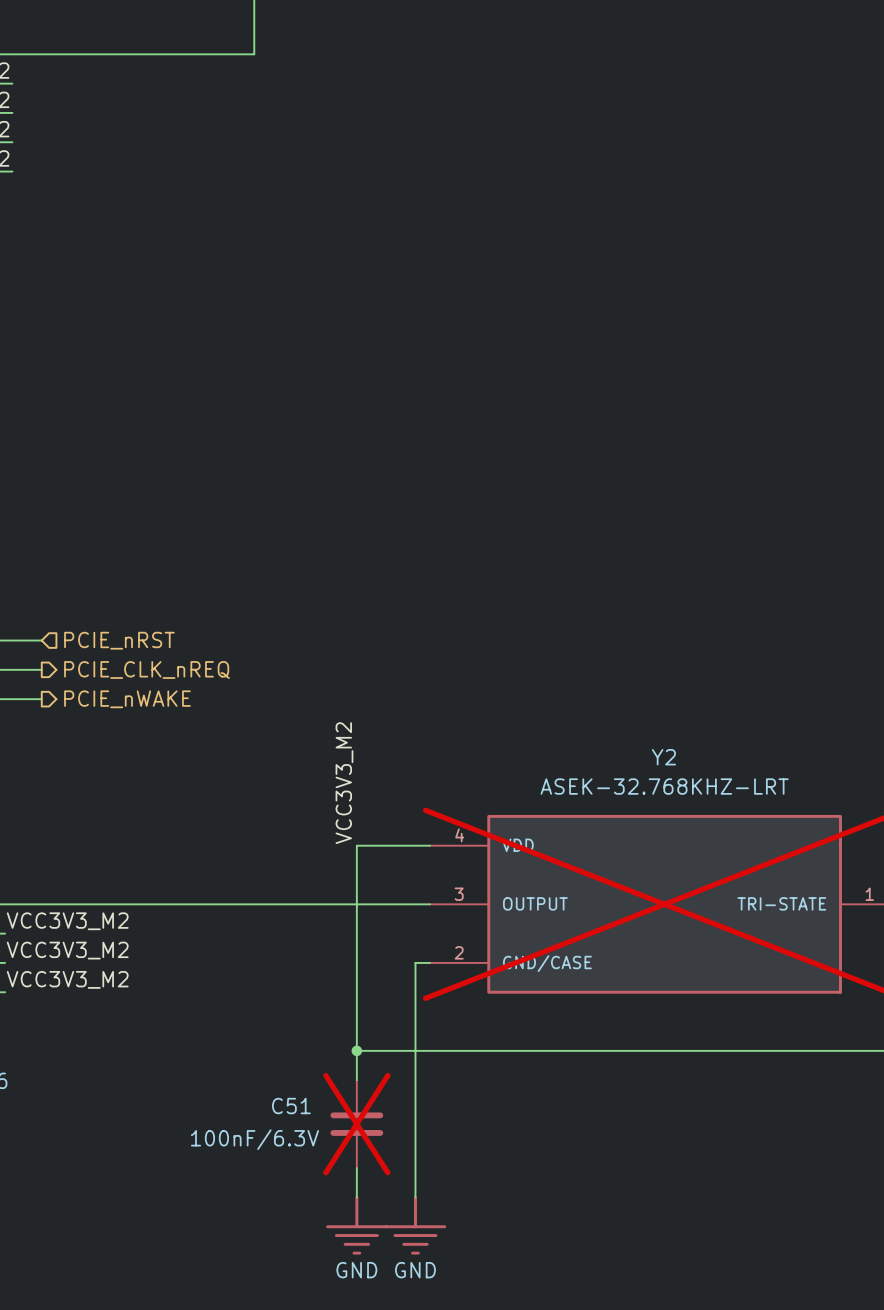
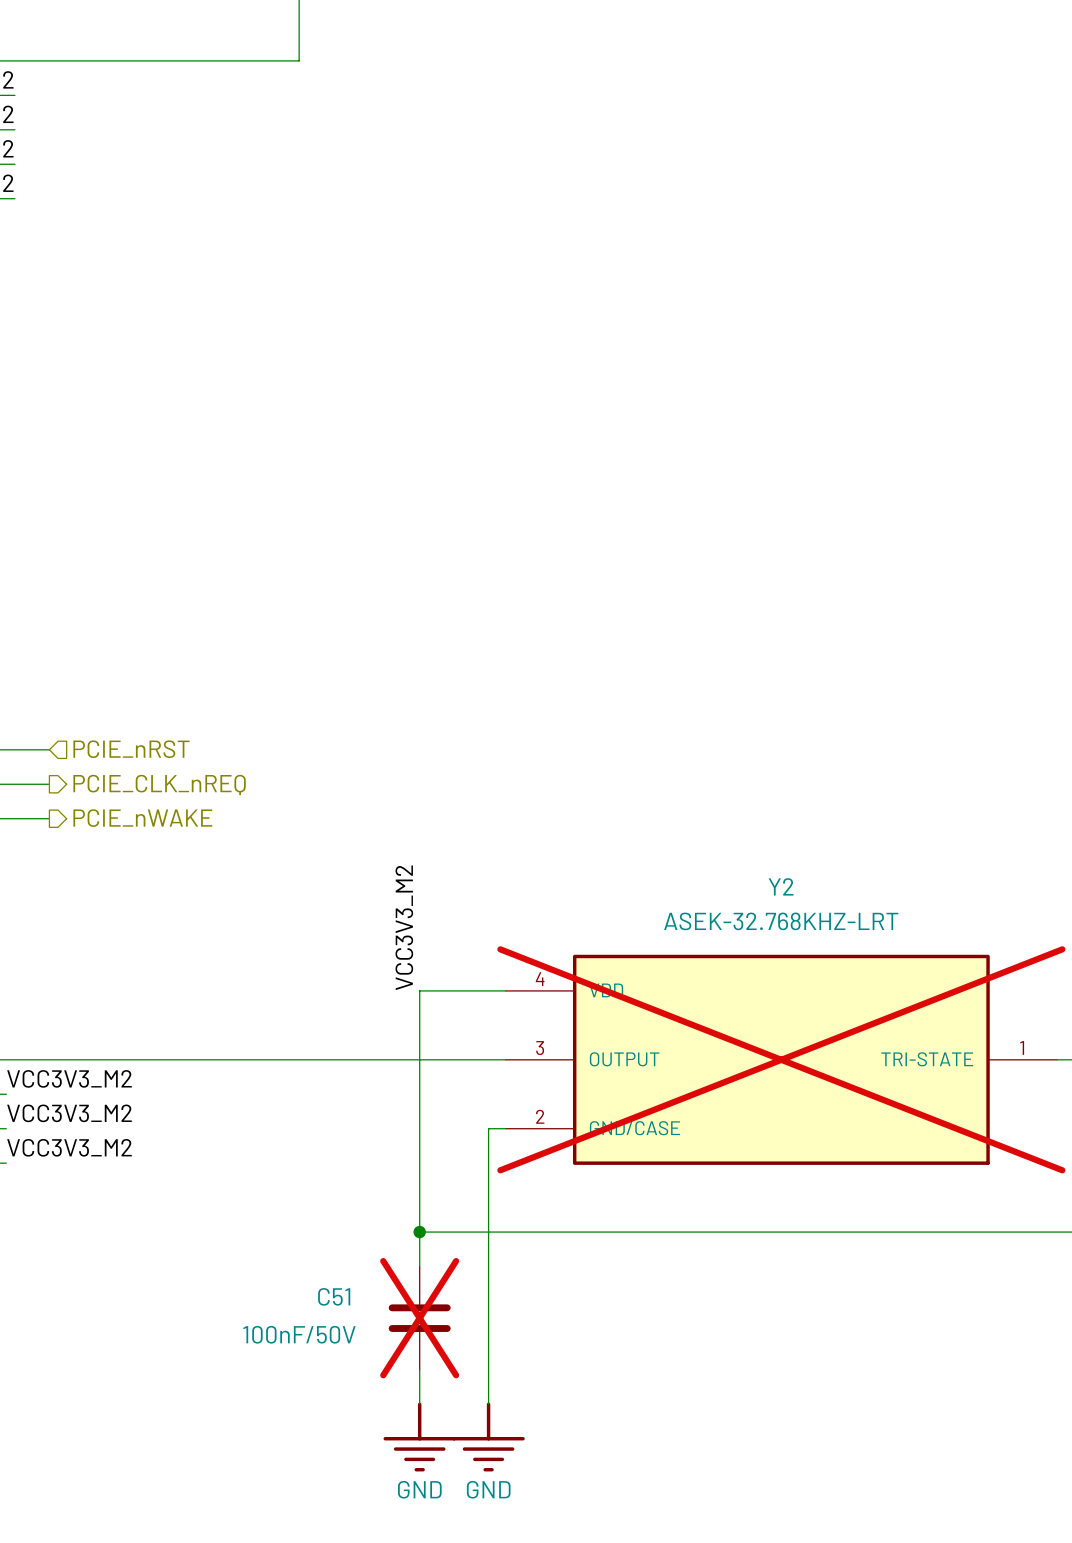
C51 value: 100nF/6.3V (254, 1139) -> 100nF/50V (299, 1334)

